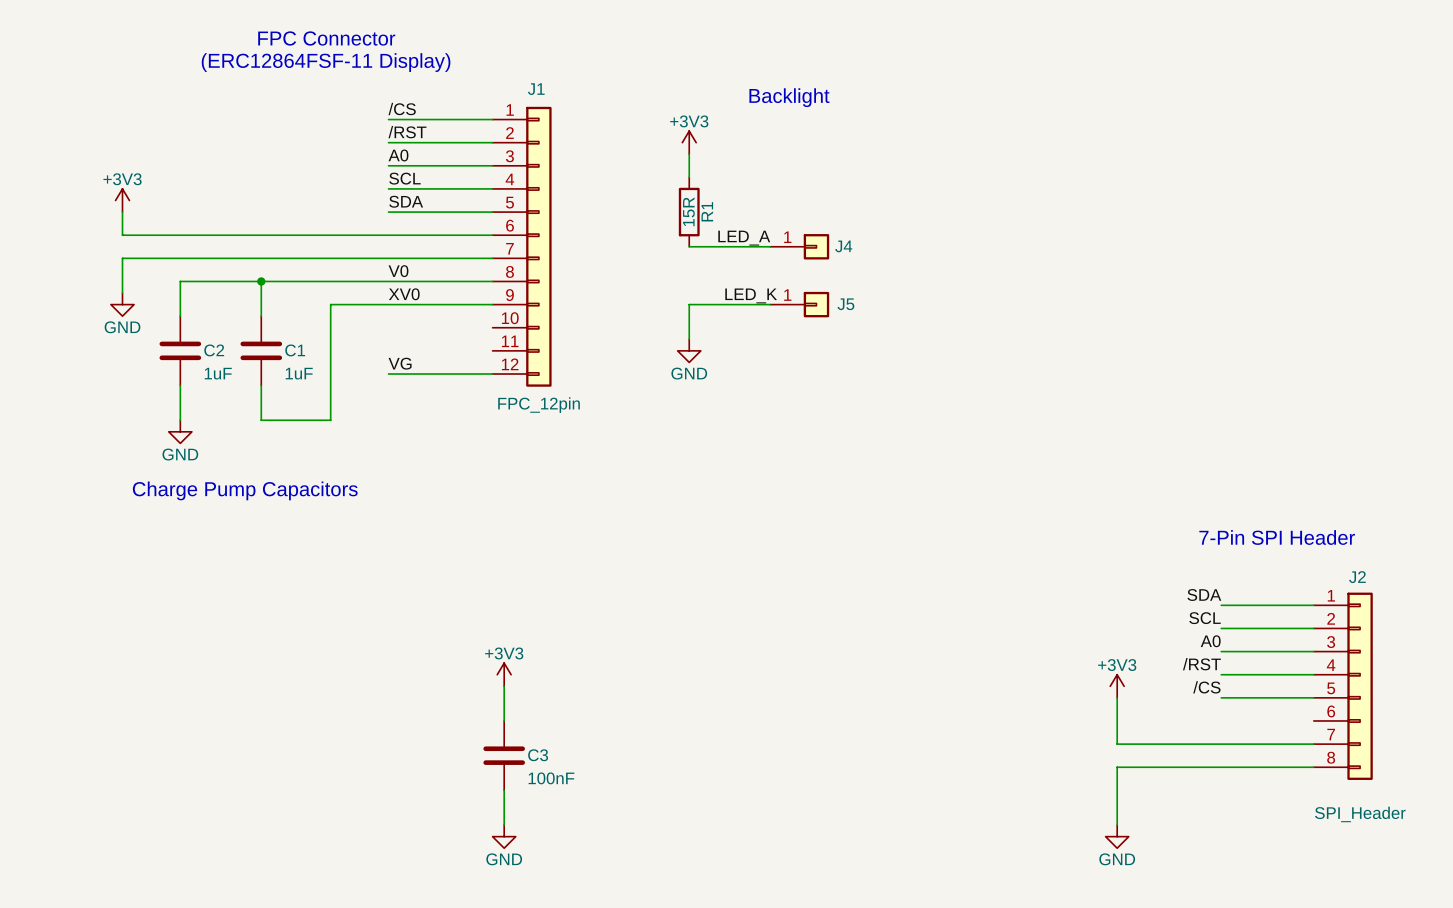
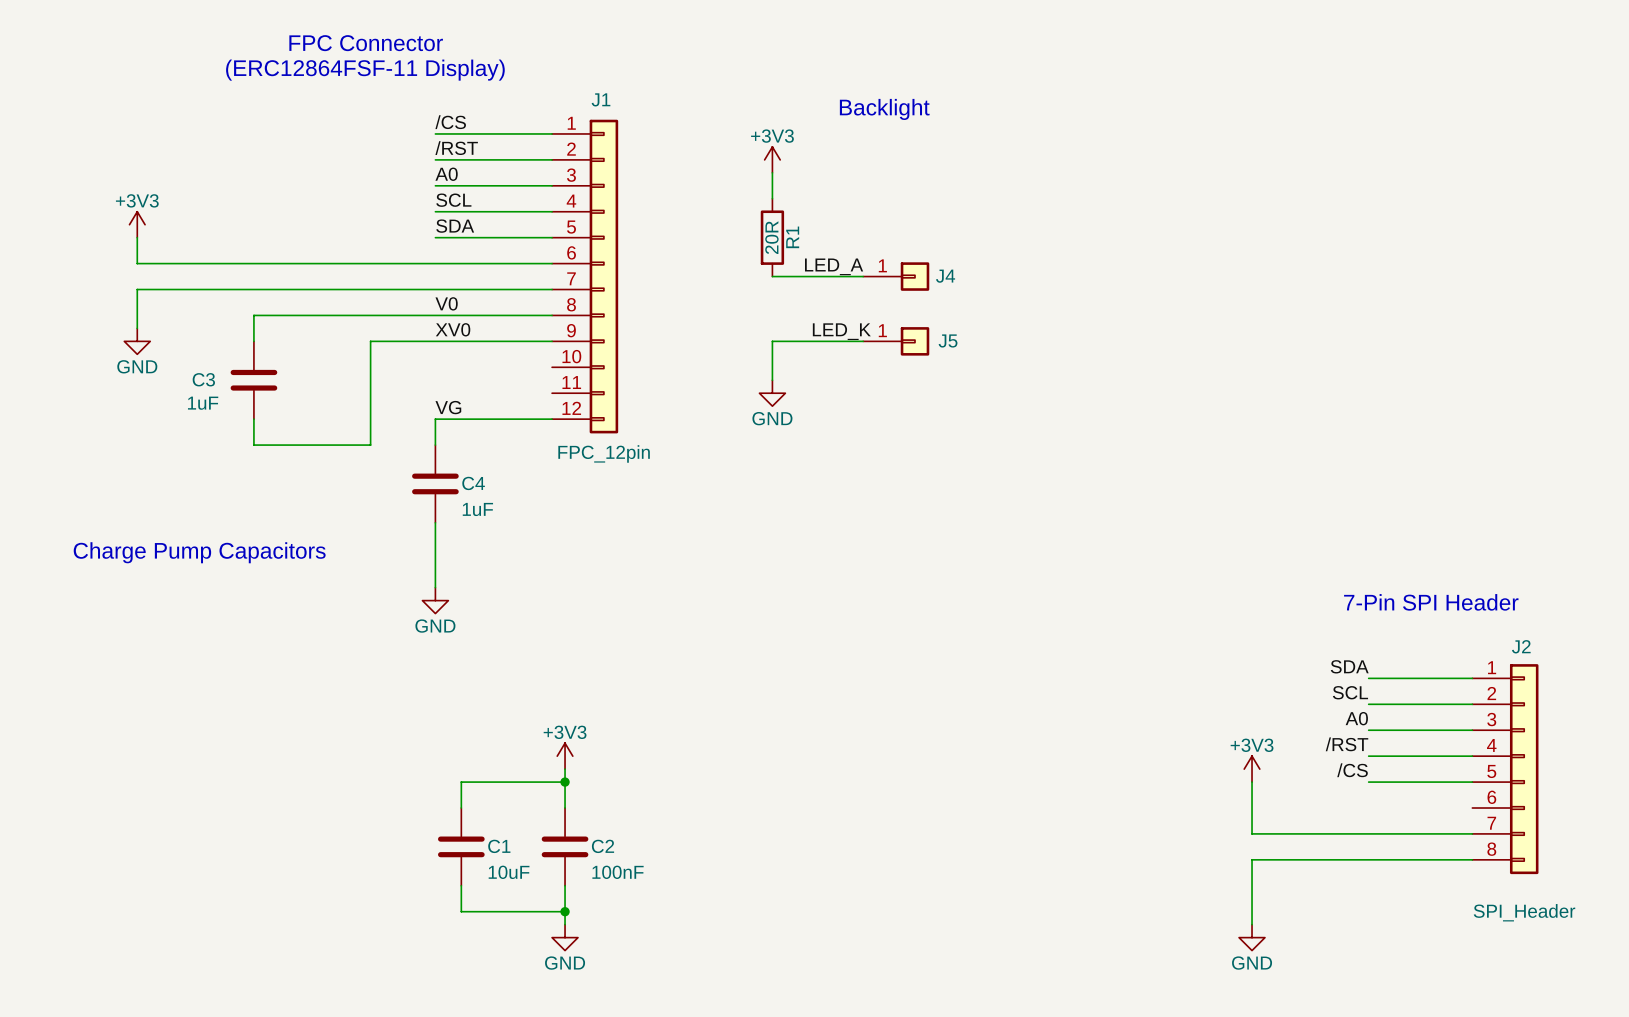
R1 value: 15R (688, 211) -> 20R (771, 237)
wire: (226, 281) (180, 281) (180, 316) -> (253, 315) (253, 341)
wire: (261, 281) (261, 316) -> none
junction: (261, 281) -> none
C3: none -> 1uF (253, 380)
C2: 1uF (180, 350) -> none
C1 position: (261, 350) -> (461, 846)
C1 value: 1uF (299, 373) -> 10uF (509, 872)
wire: none -> (435, 419) (435, 445)
wire: (180, 385) (180, 420) -> none
wire: (261, 385) (261, 420) (330, 420) (330, 397) -> (253, 419) (253, 445) (370, 445)
power symbol: GND (180, 431) -> none
C4: none -> 1uF (435, 483)
wire: none -> (435, 522) (435, 587)
text position: Charge Pump Capacitors (245, 490) -> Charge Pump Capacitors (199, 552)
power symbol: none -> GND (435, 600)
wire: none -> (565, 782) (461, 782) (461, 808)
junction: none -> (565, 782)
C3 name: C3 (538, 755) -> C2 (603, 846)
wire: none -> (461, 885) (461, 911) (565, 911)
junction: none -> (565, 911)

